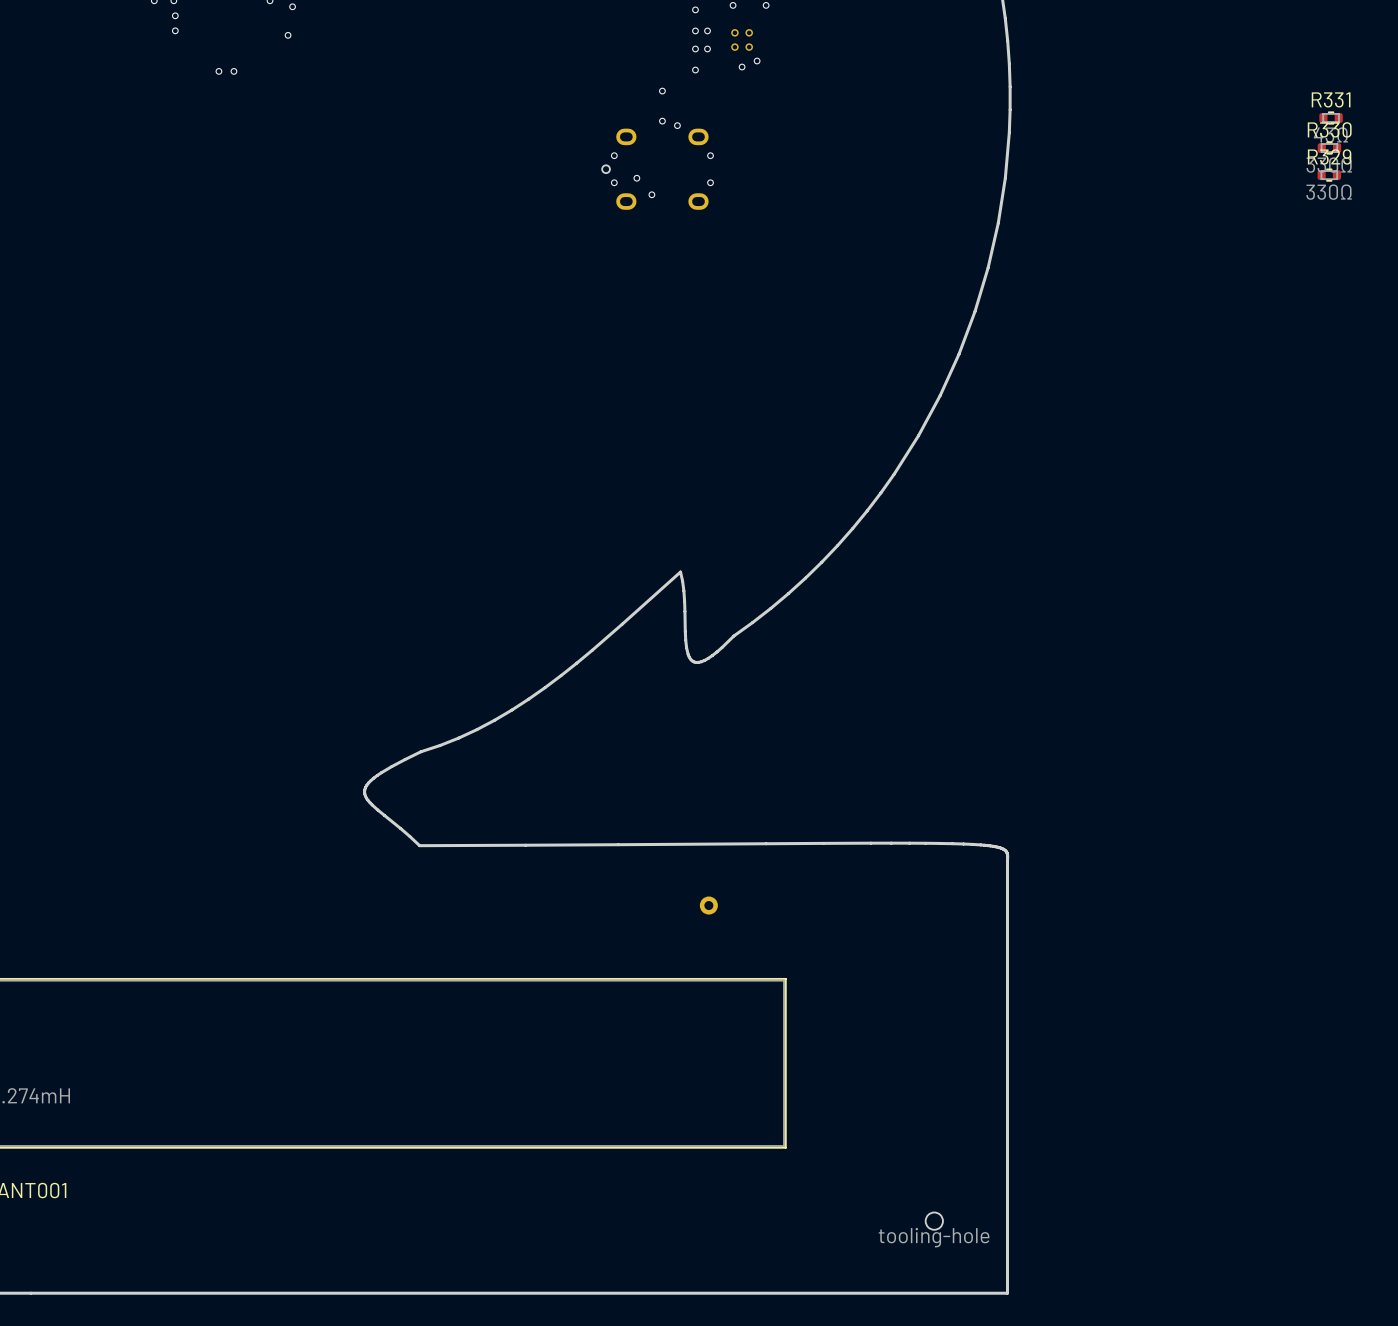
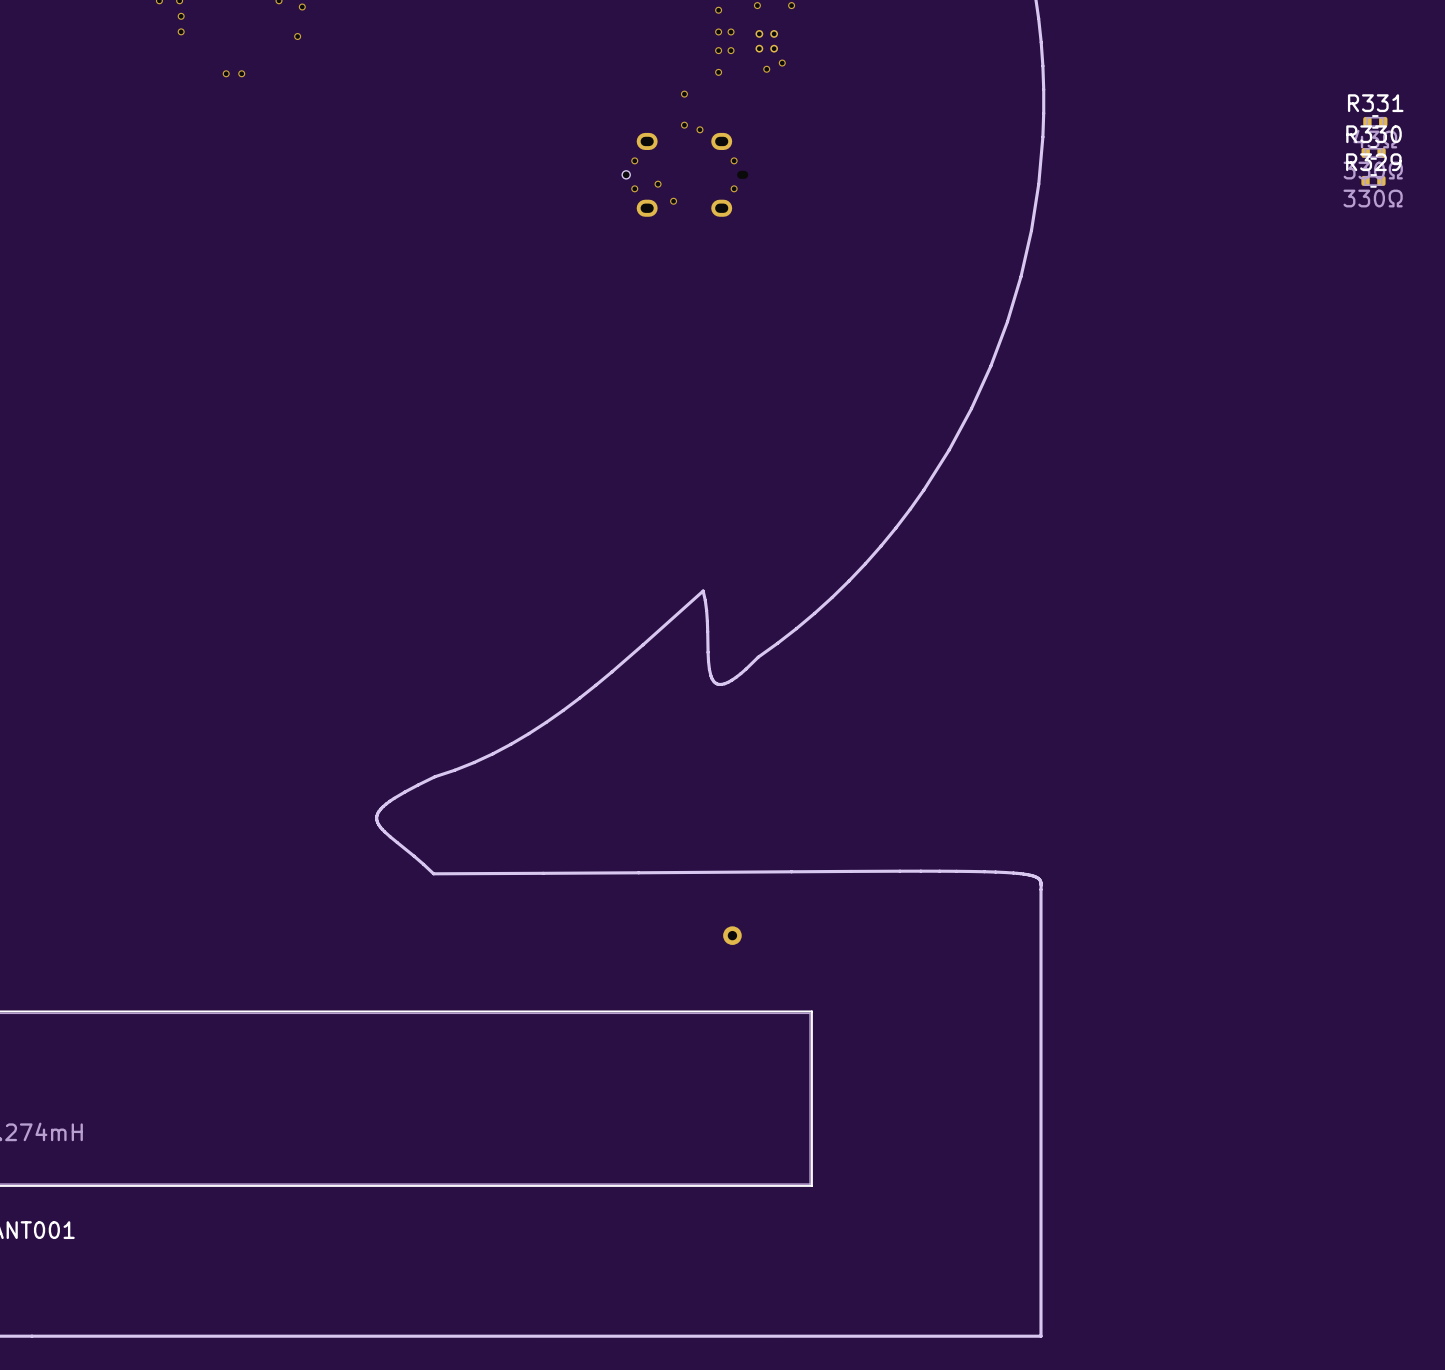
part: tooling-hole (934, 1221) -> none

